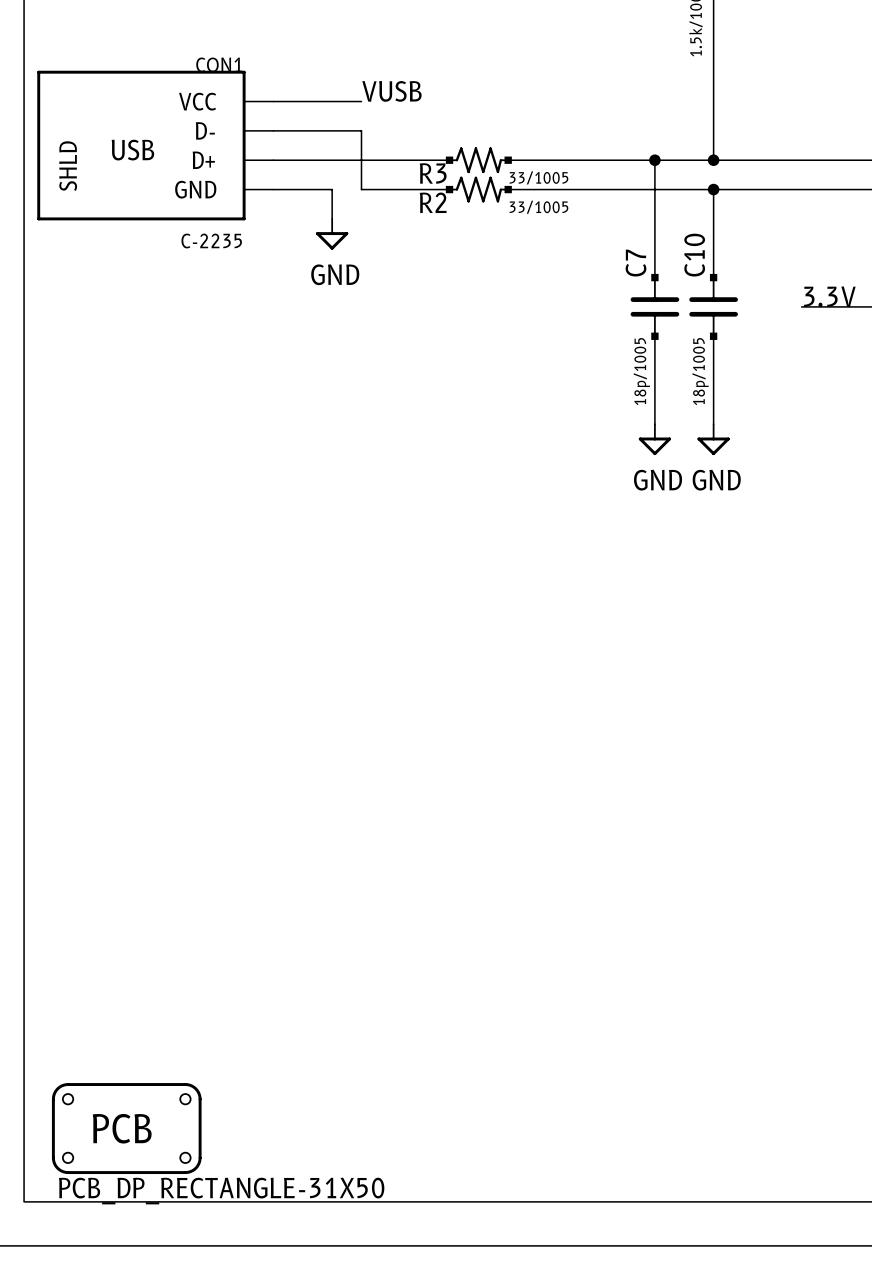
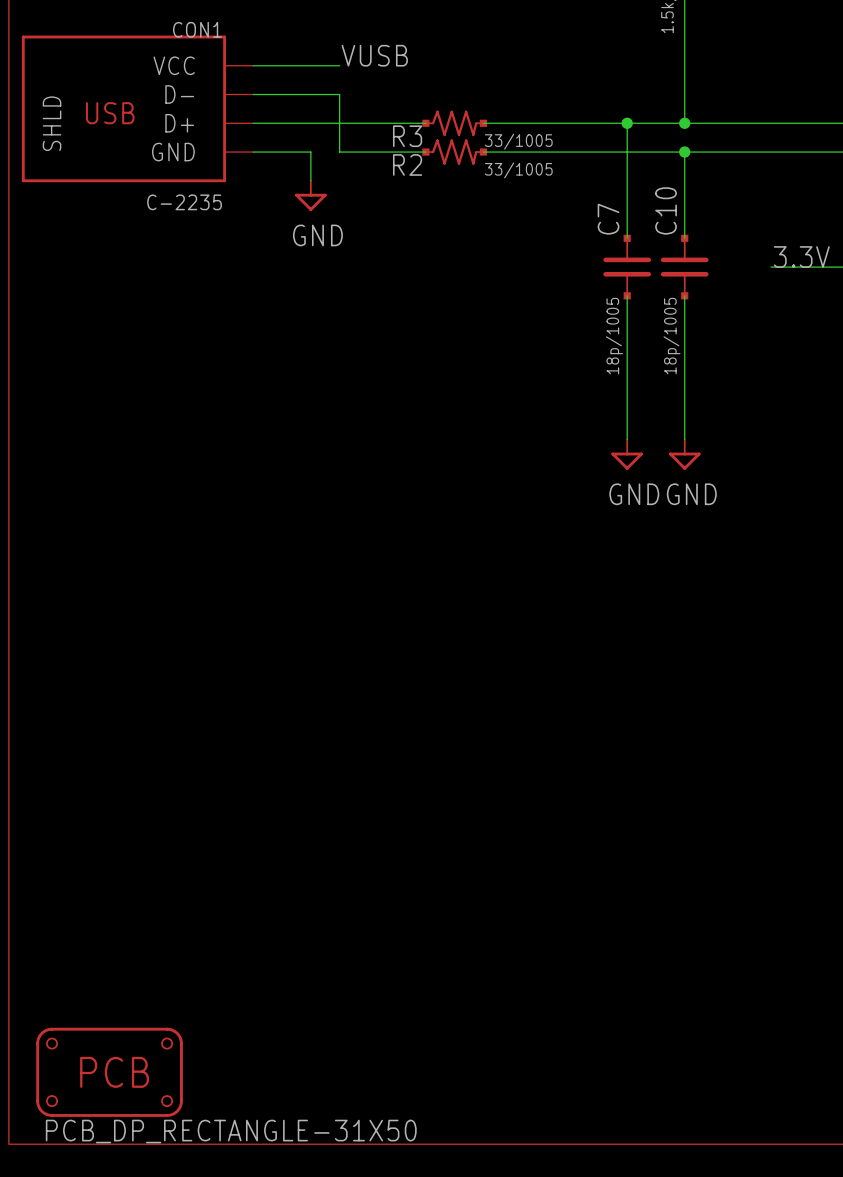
wire: none -> (627, 382) (627, 439)
wire: none -> (684, 382) (684, 439)
power symbol: GND (654, 439) -> none
power symbol: GND (713, 439) -> none
power symbol: none -> GND (627, 454)
power symbol: none -> GND (684, 454)

